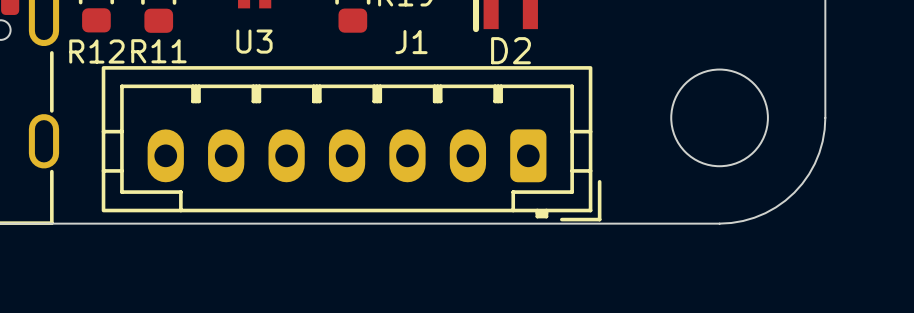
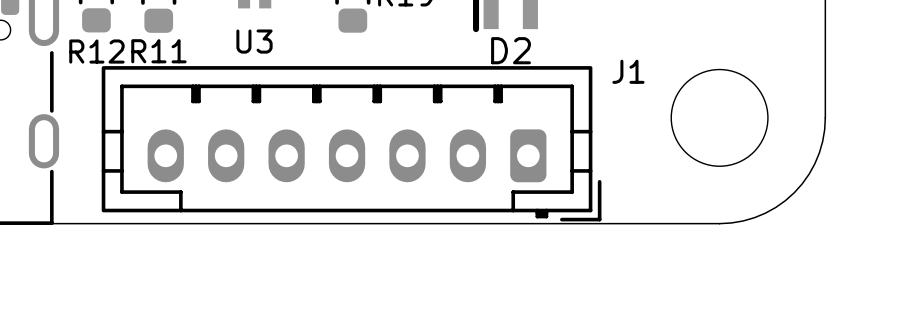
J1 name position: J1 (411, 42) -> J1 (628, 71)

